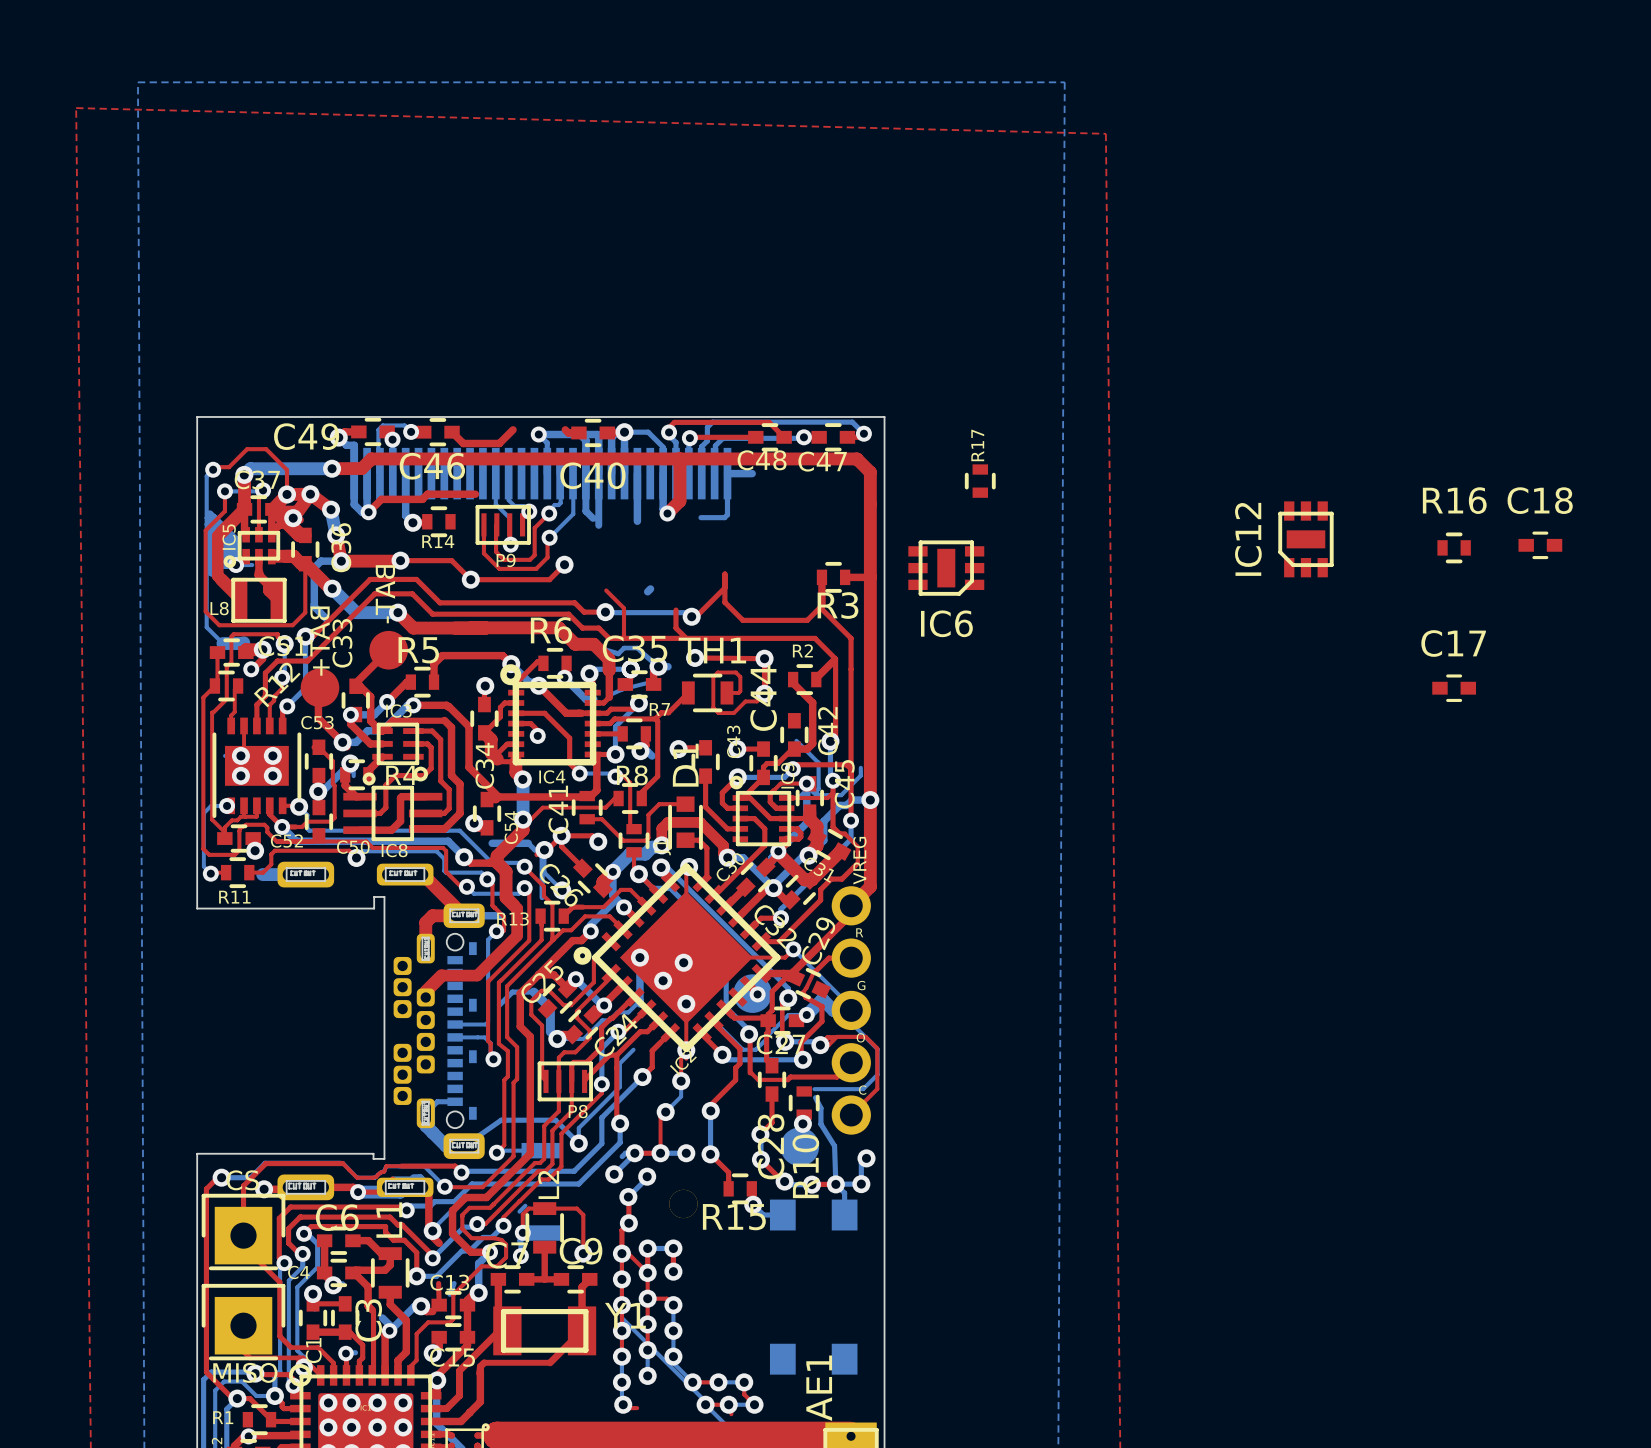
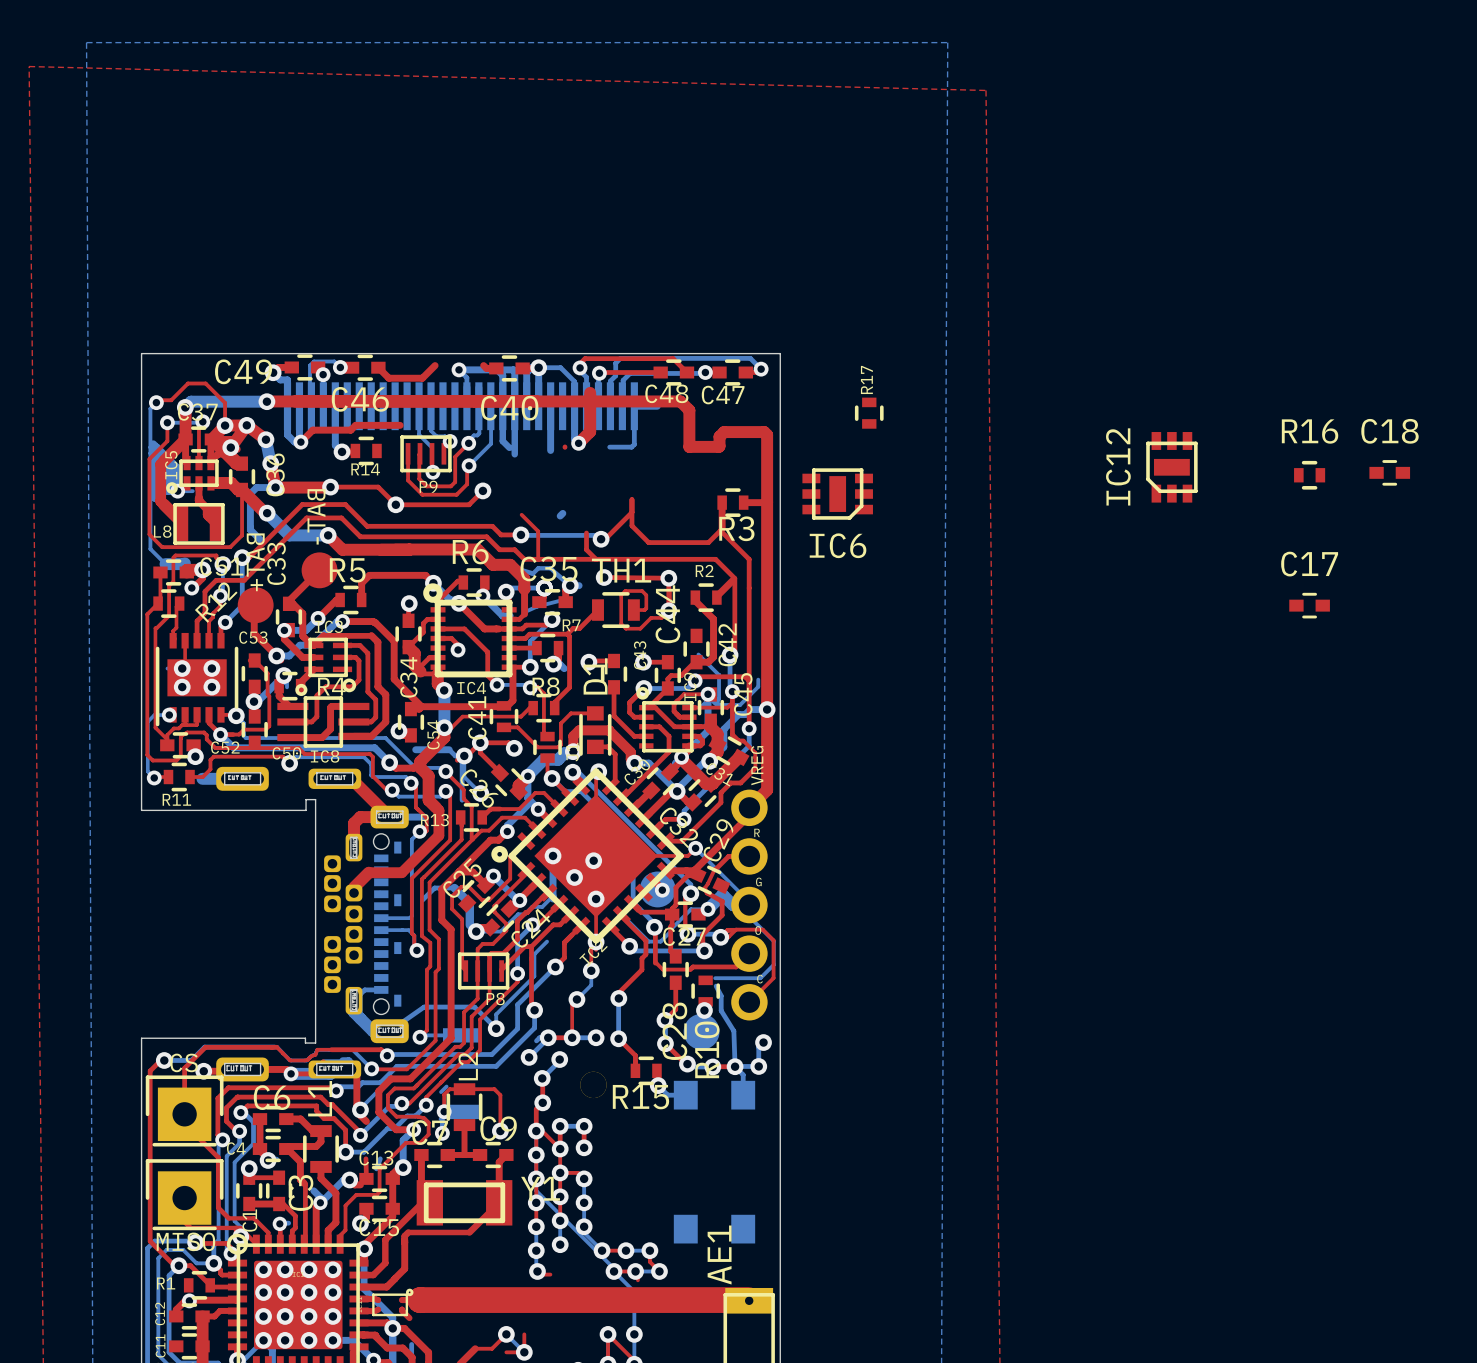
top track: (332, 468) (361, 468) (371, 458) (856, 458) (870, 472) (870, 504) -> (267, 401) (680, 401) (689, 410) (689, 446) (718, 446) (719, 436) (724, 432) (764, 432) (767, 434)
top track: none -> (564, 446) (564, 447)

